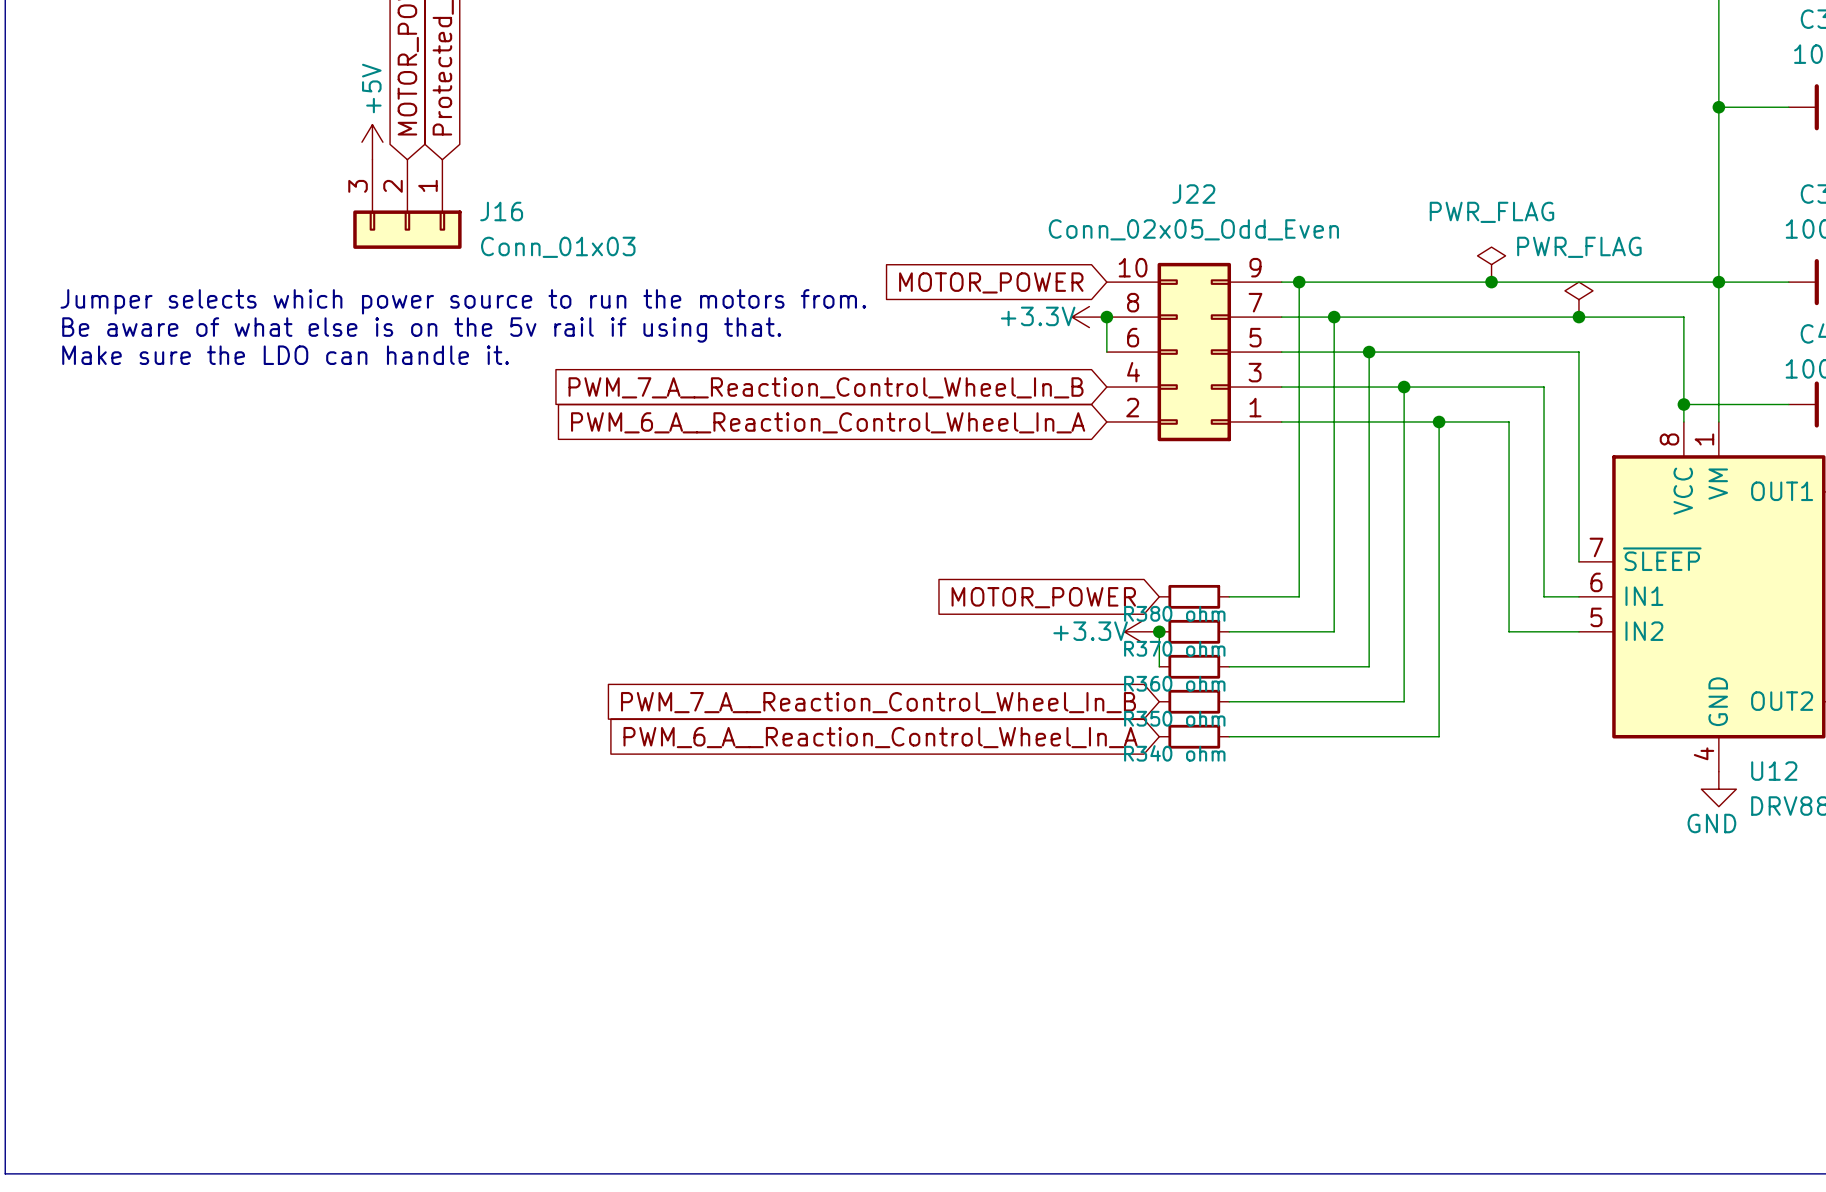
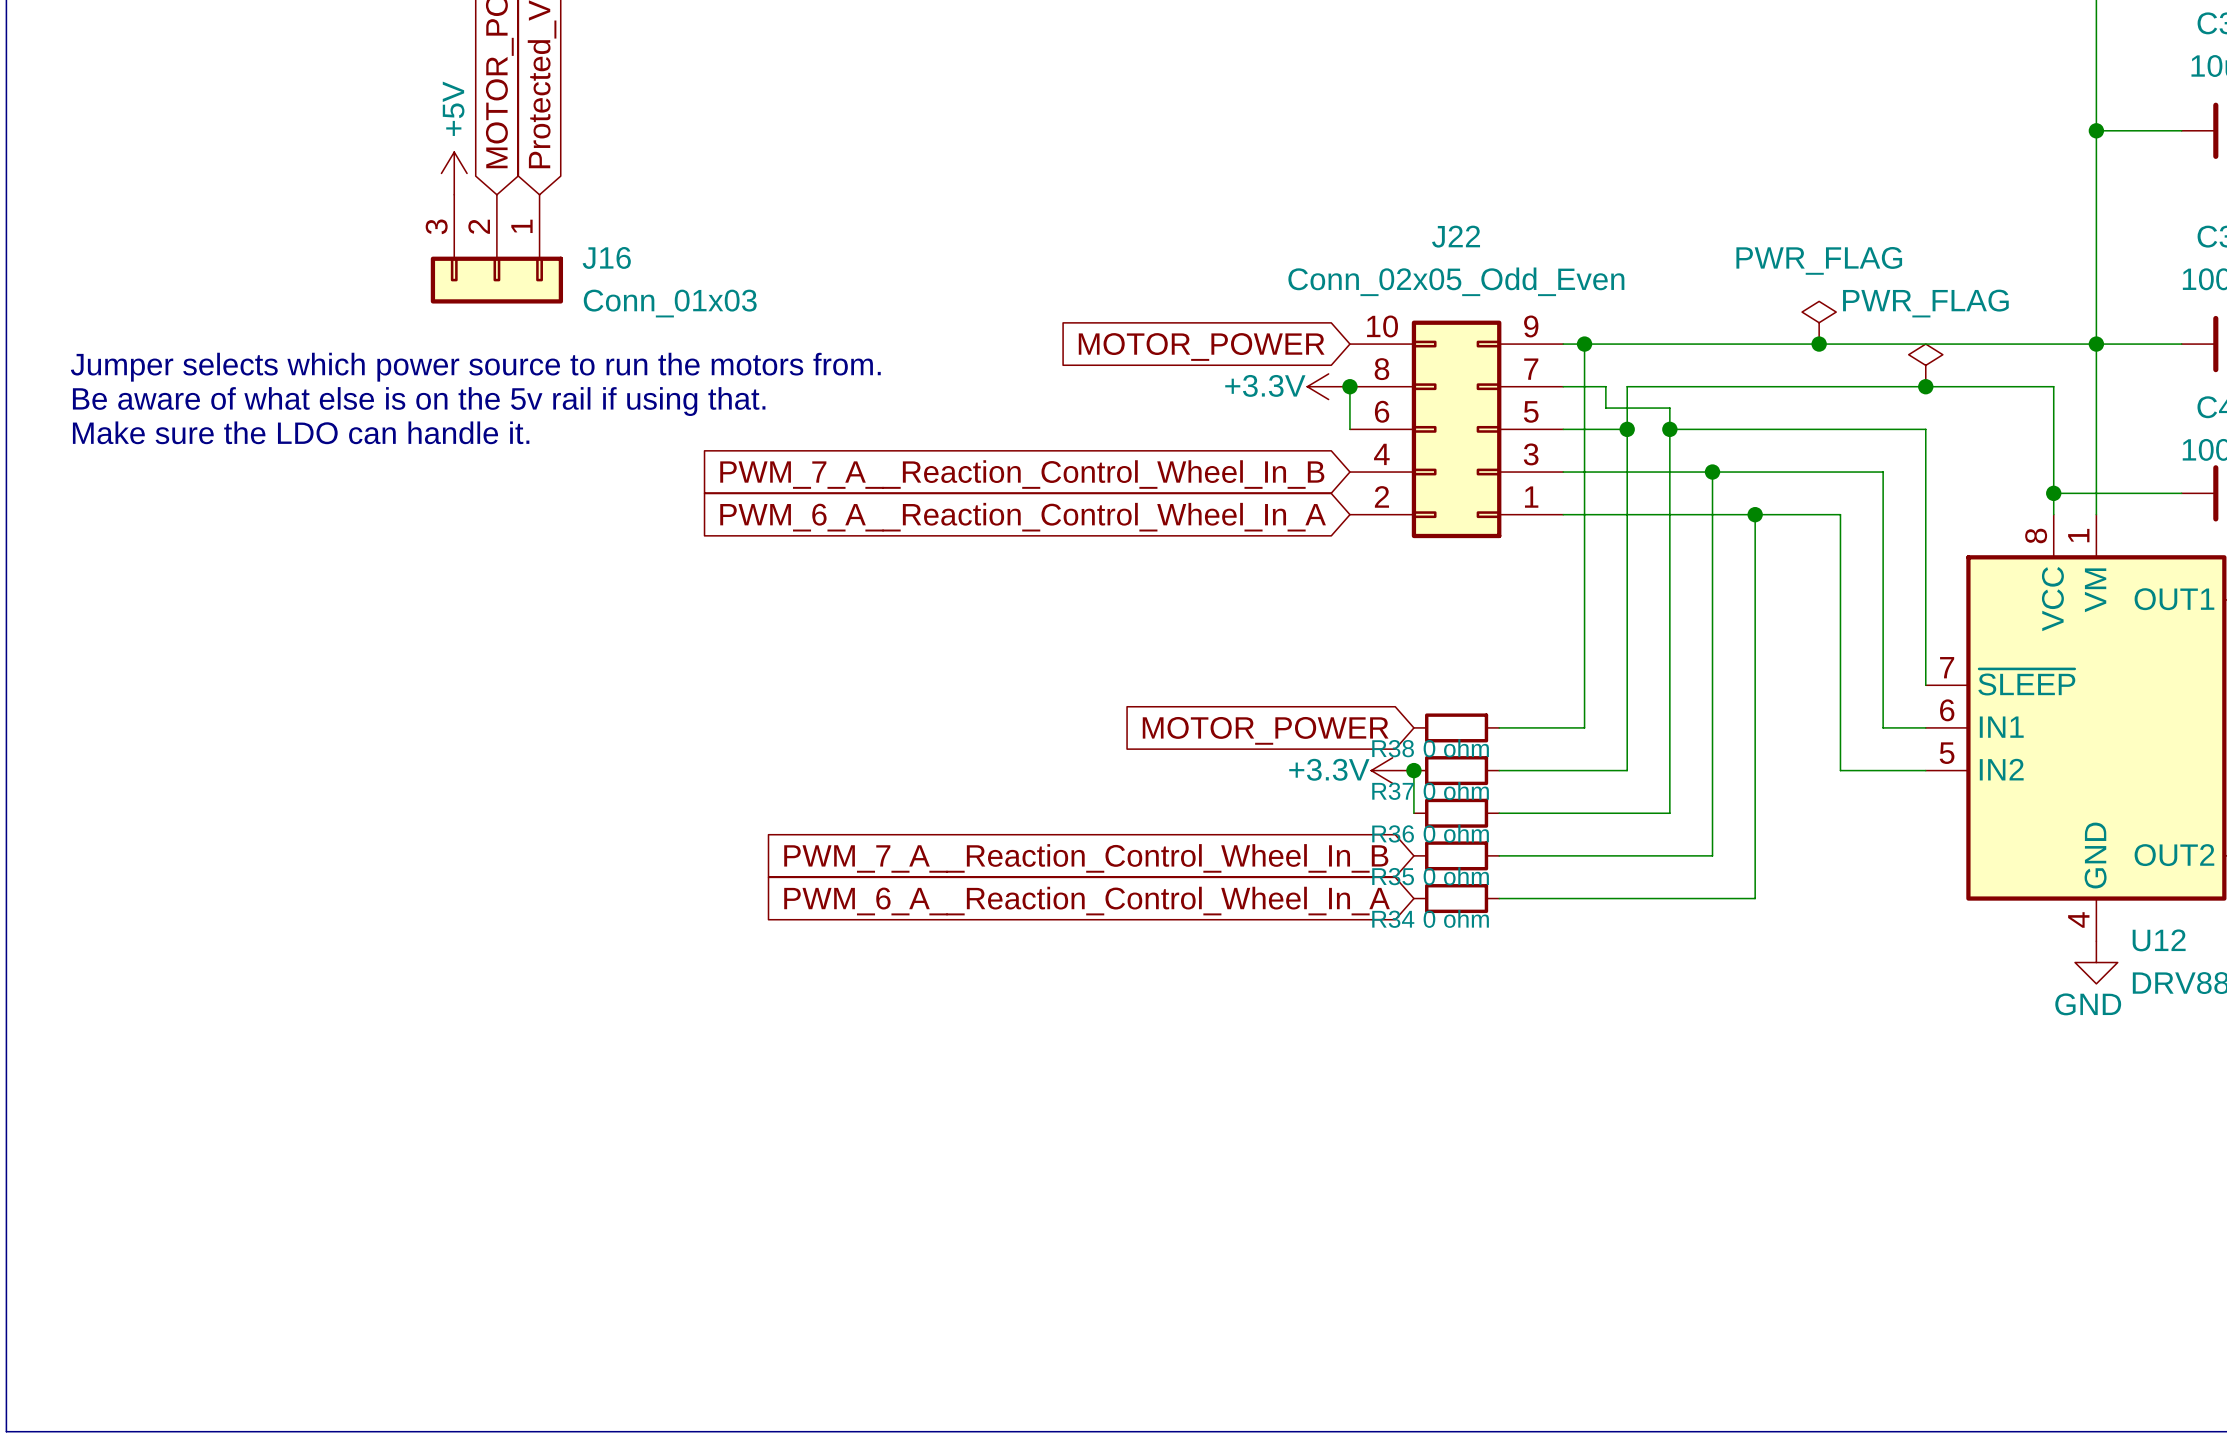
wire: (1316, 317) (1334, 317) -> none
junction position: (1334, 317) -> (1627, 429)
wire: (1334, 352) (1369, 352) -> (1605, 386) (1605, 408) (1669, 408) (1669, 429)

